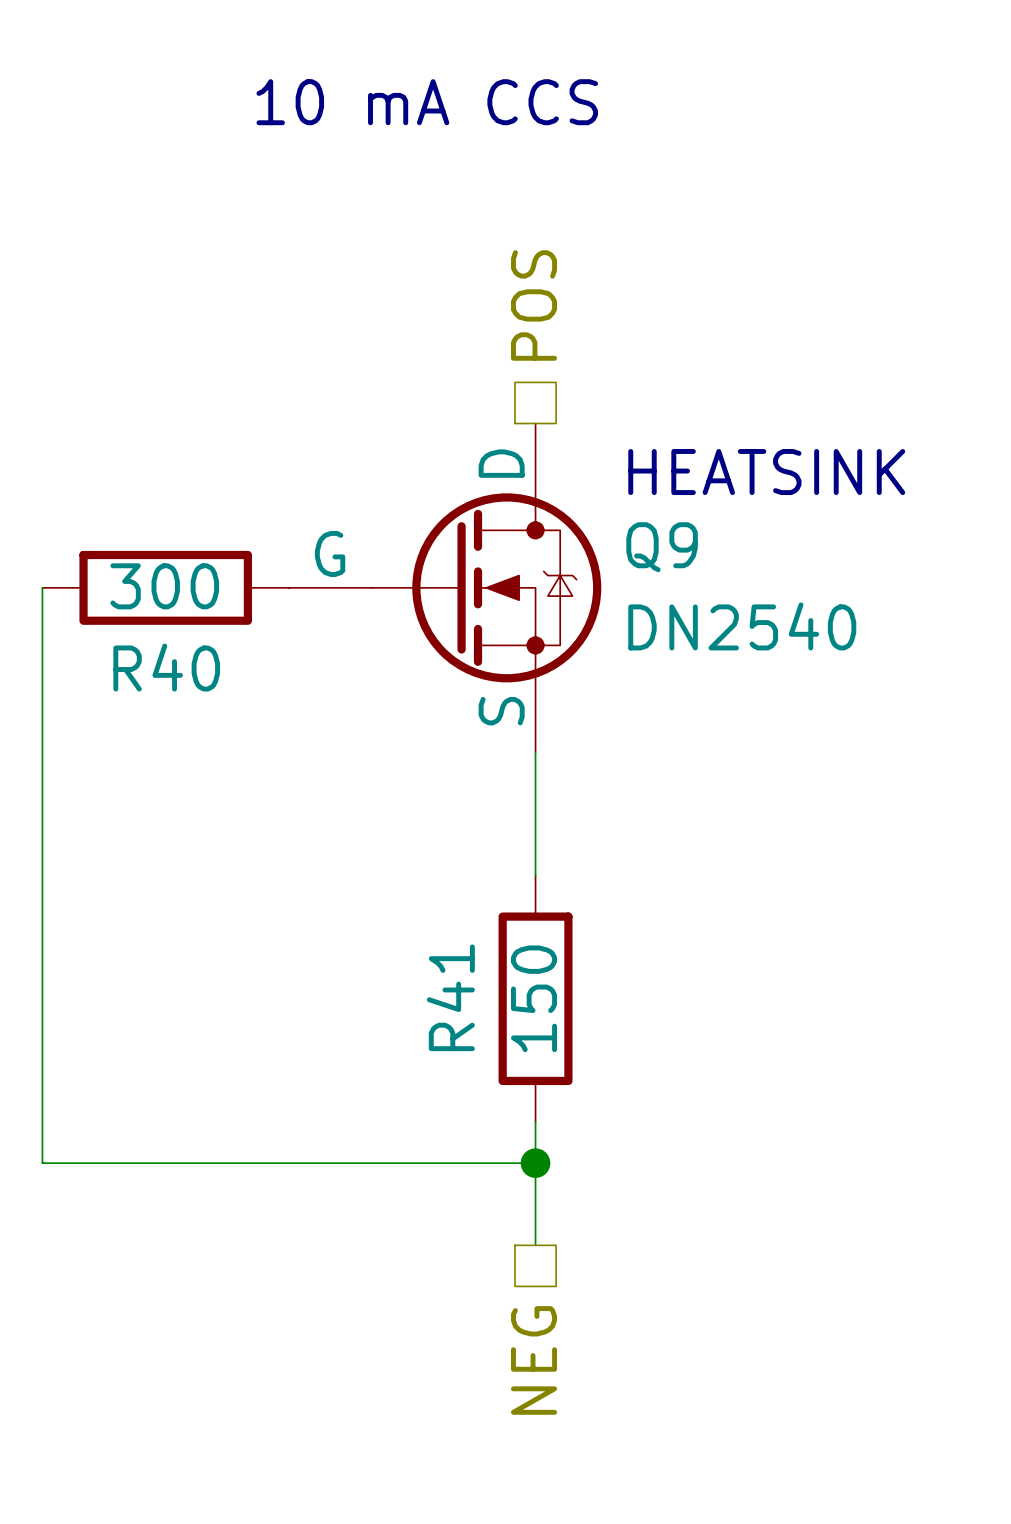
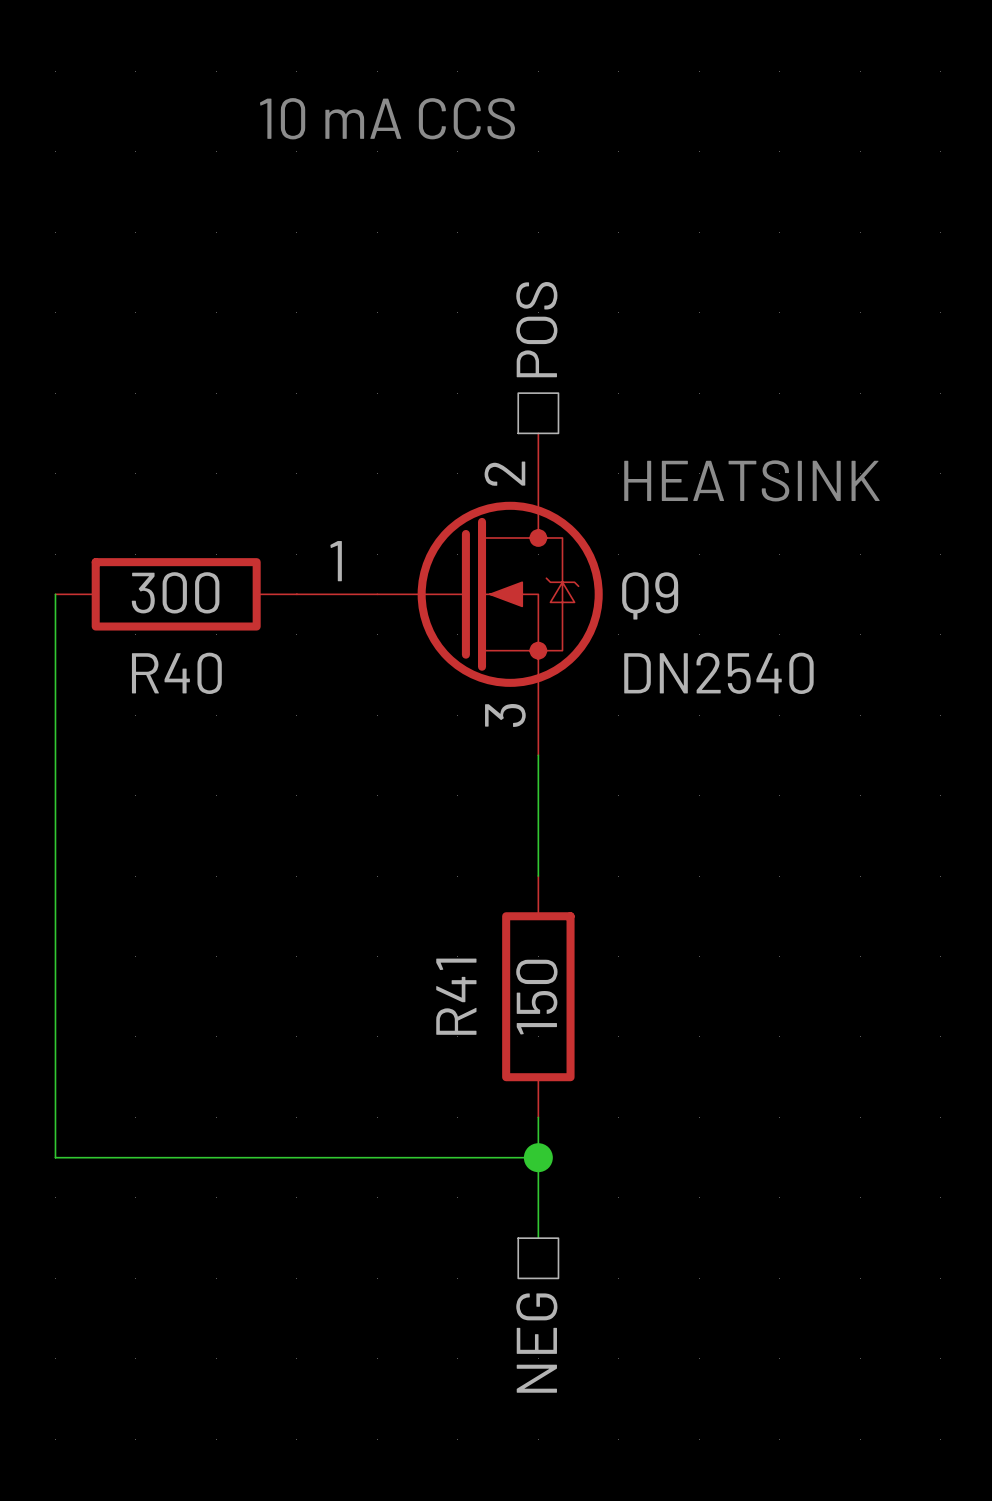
Q9 symbol: [288, 423, 602, 753] -> [296, 433, 603, 756]

